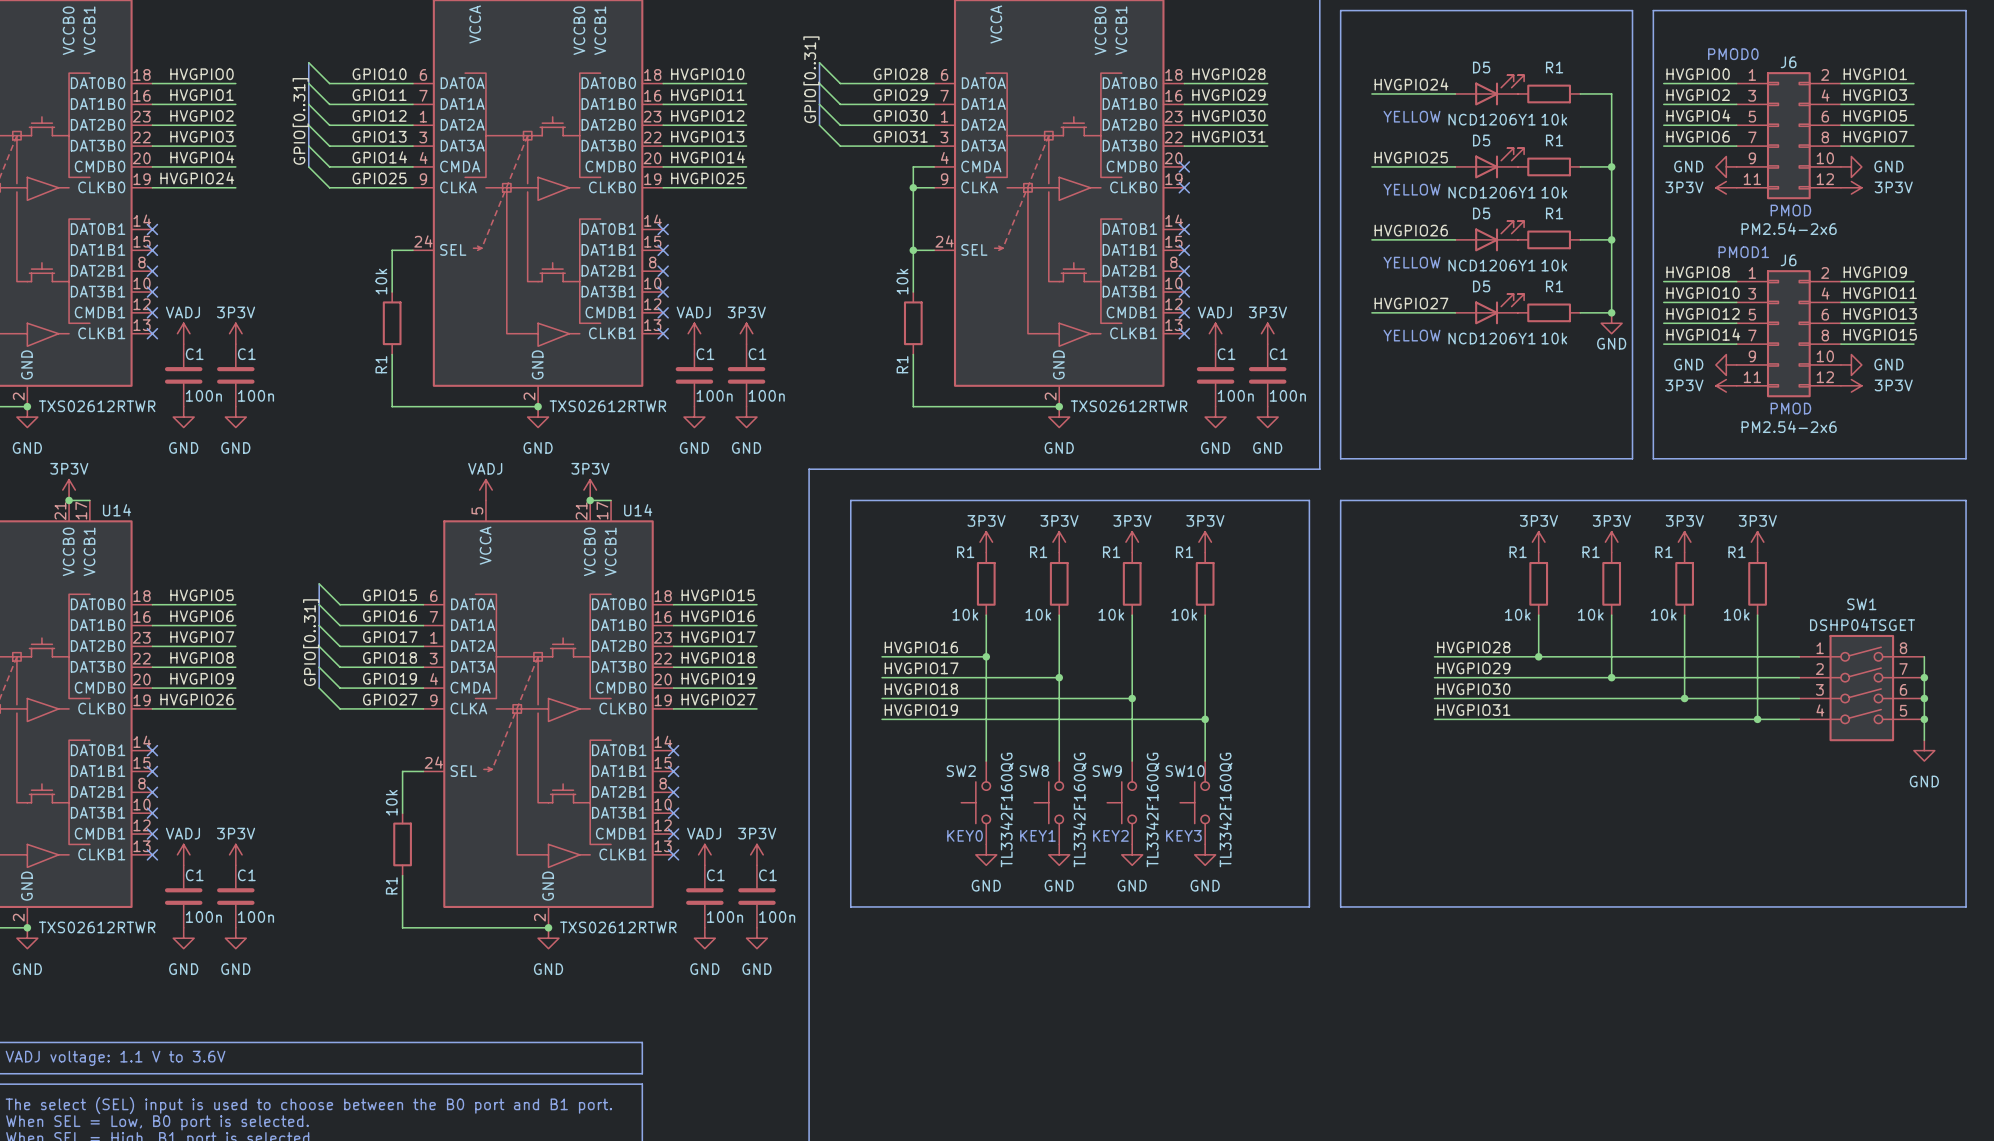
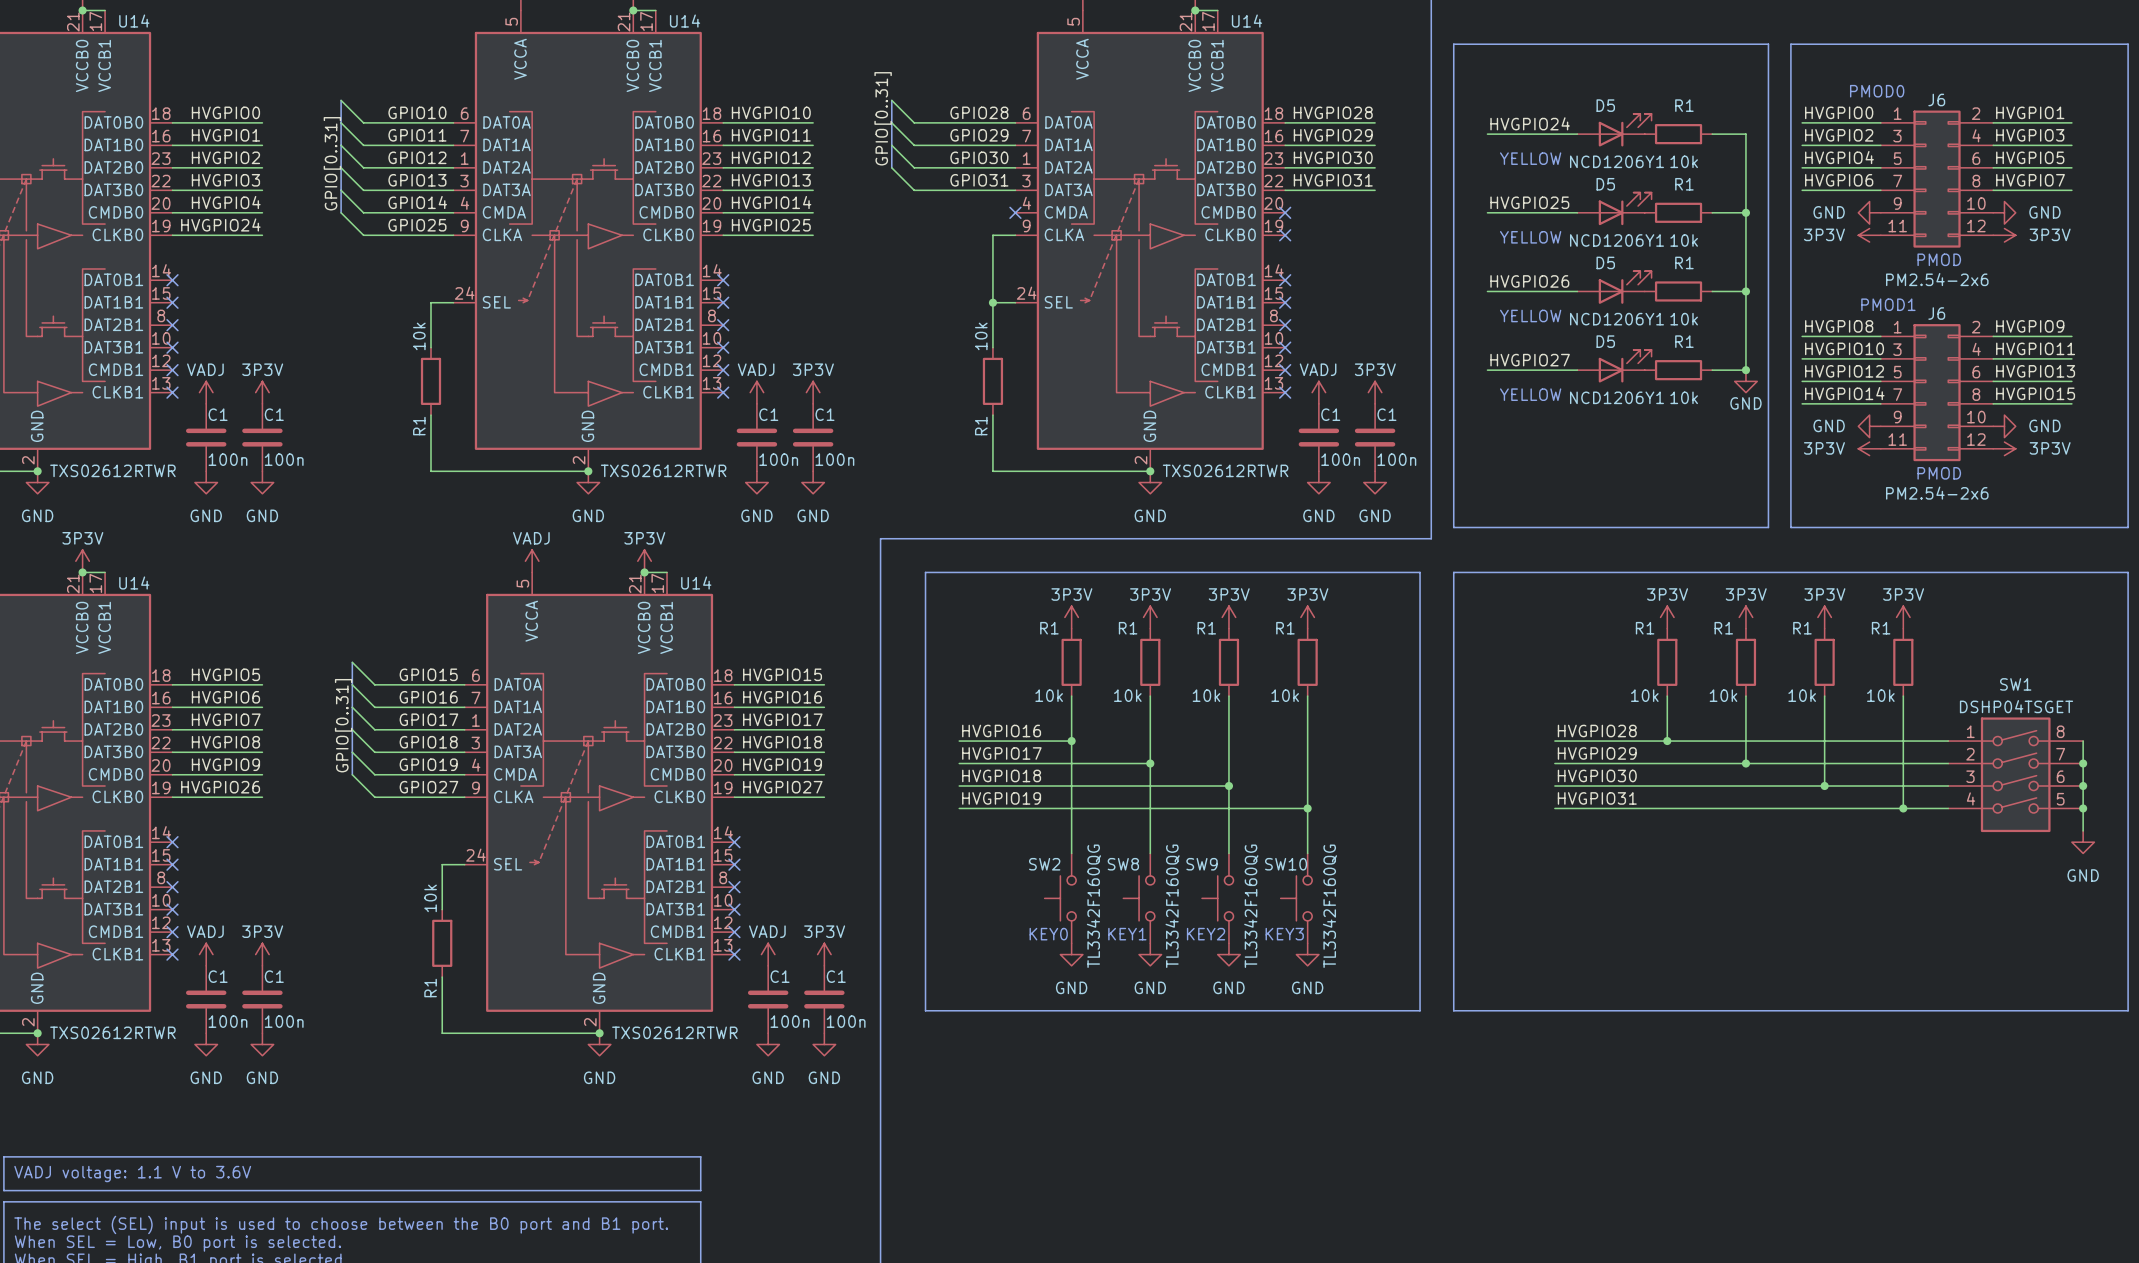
wire: (934, 166) (913, 166) (913, 187) -> none
no-connect mark: none -> (1015, 212)
junction: (913, 187) -> none

